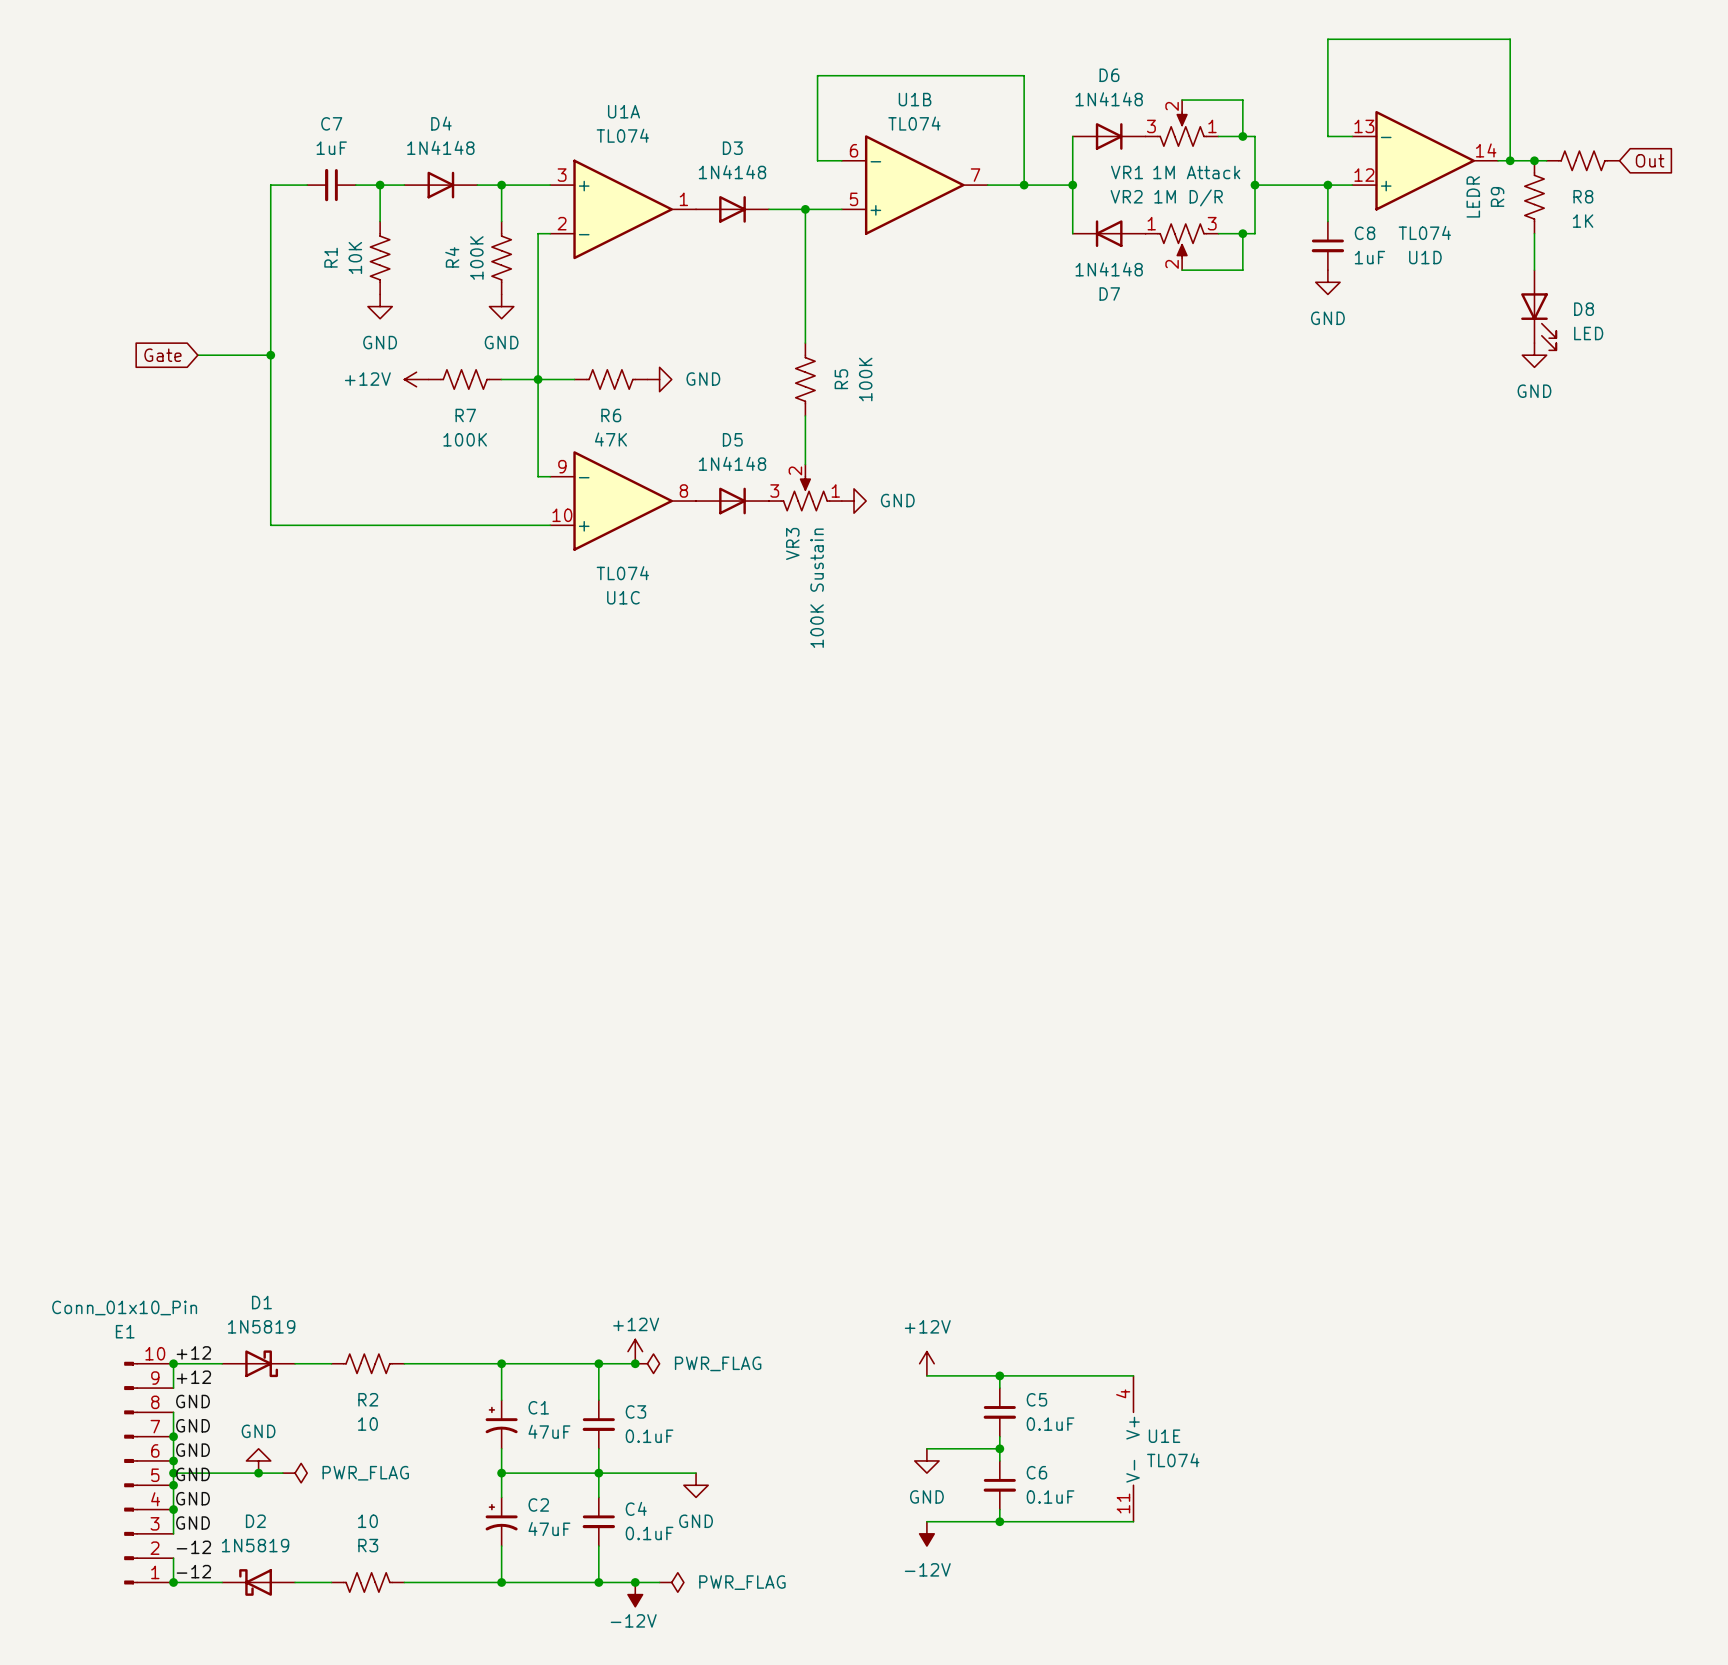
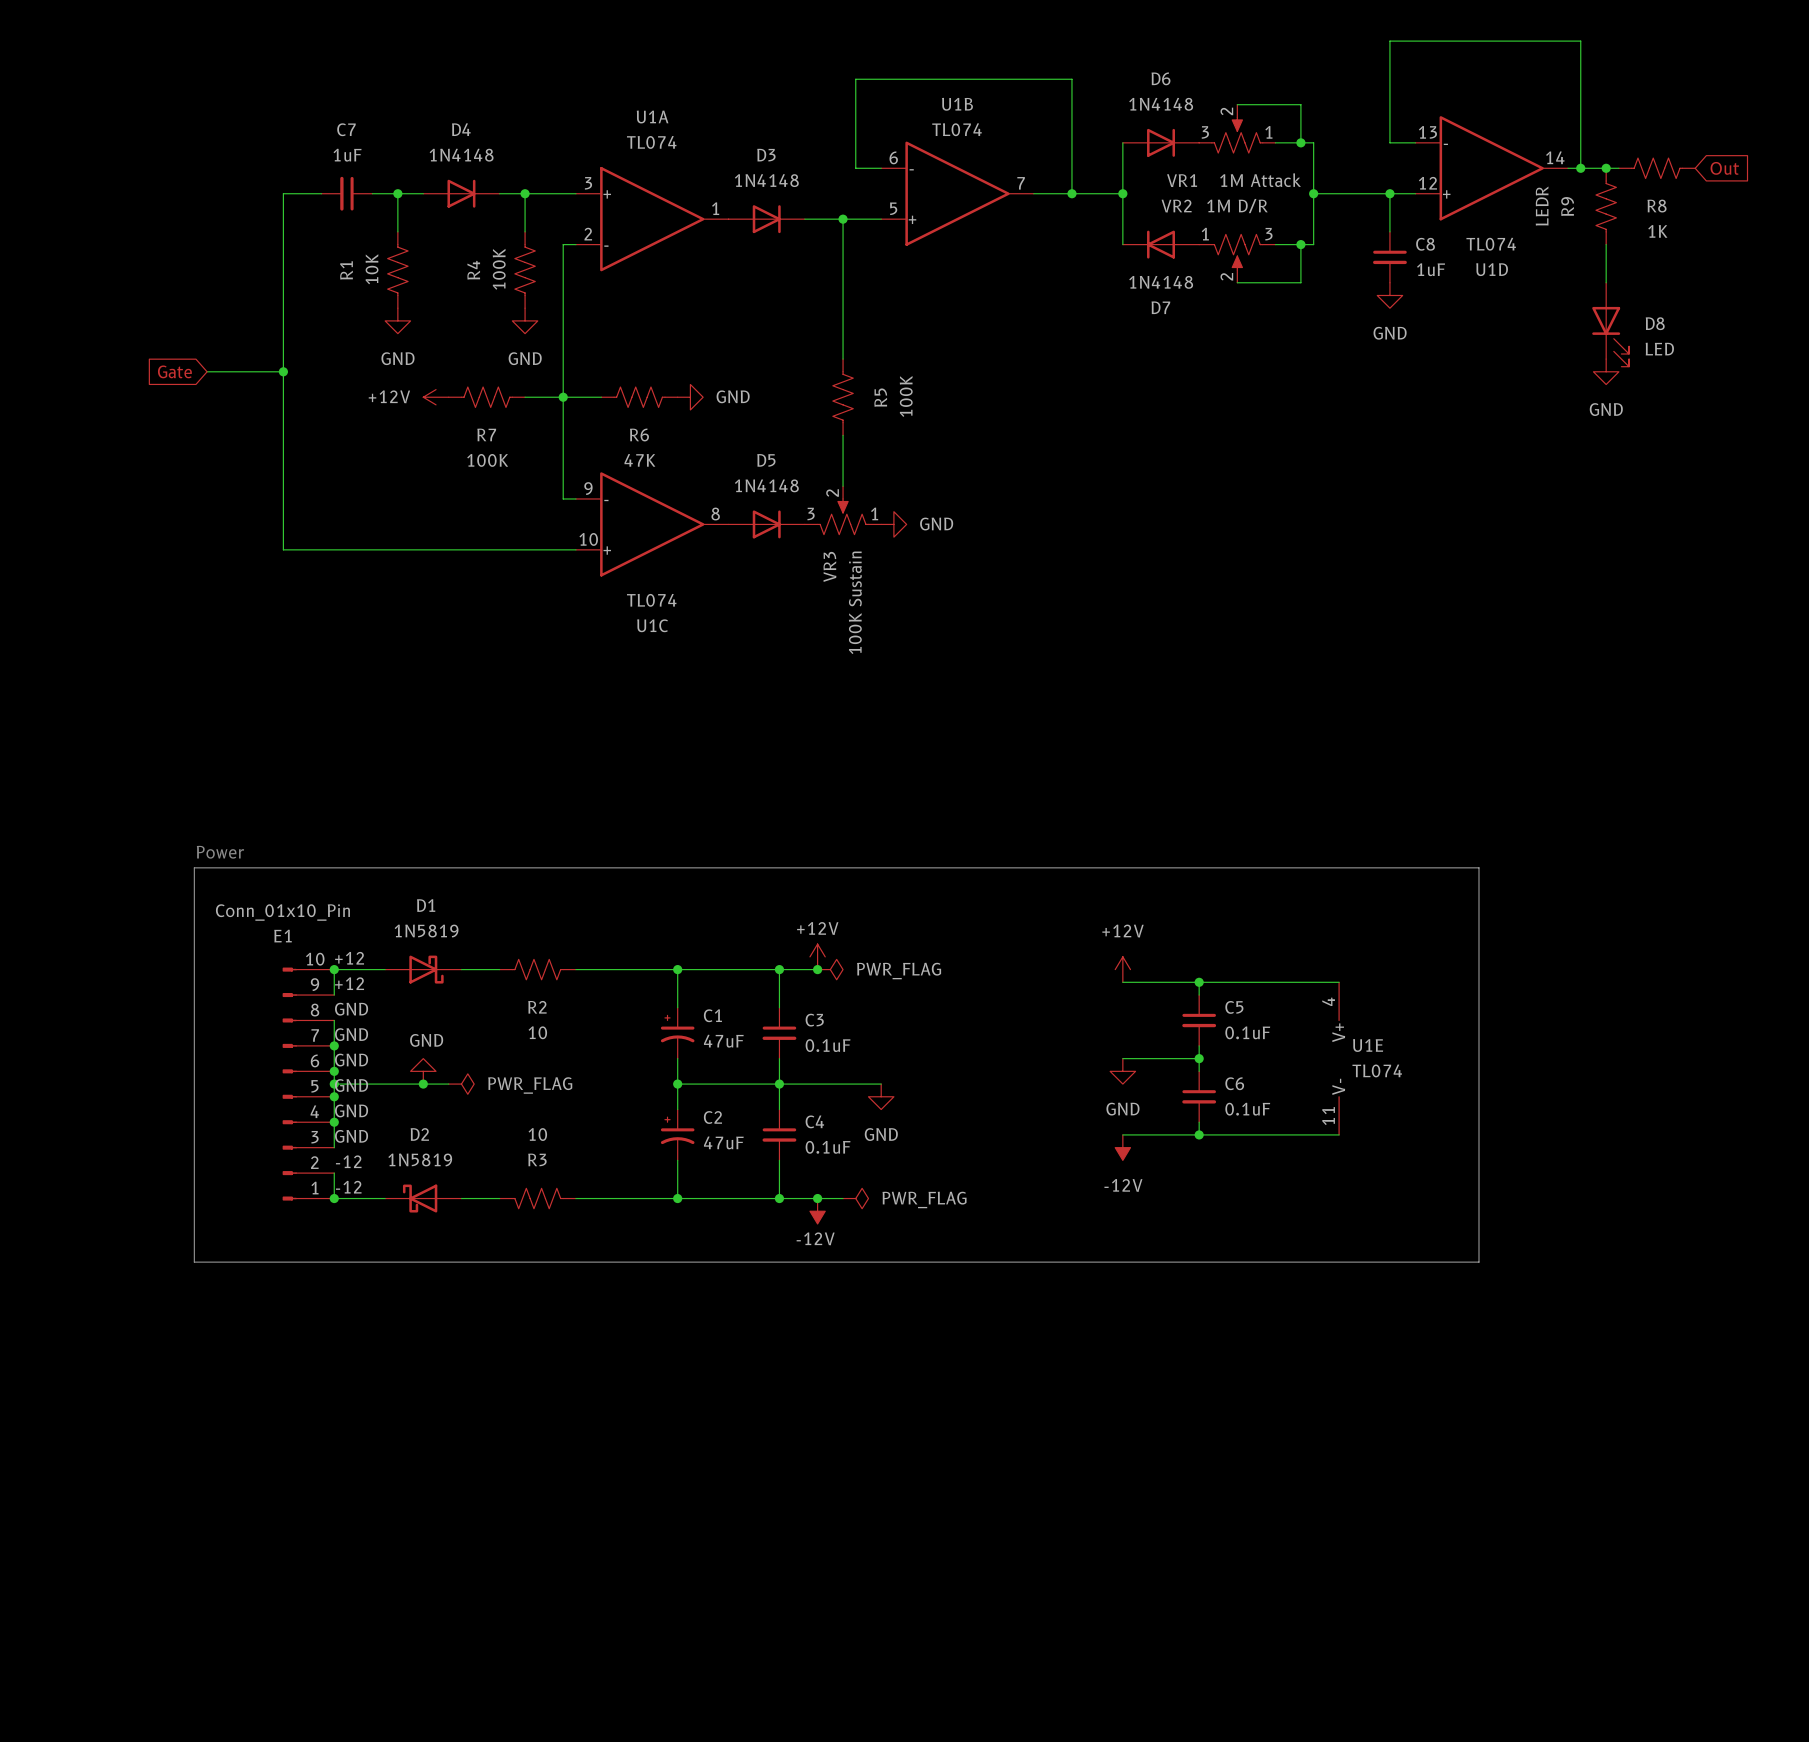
text: none -> Power (220, 852)
line: none -> (194, 867) (1478, 867) (1478, 1262) (194, 1262) (194, 867)
power symbol: none -> +12V (817, 956)
label: none -> +12 (349, 958)
junction: none -> (334, 969)
wire: none -> (385, 969) (334, 969) (334, 995)
wire: none -> (461, 969) (499, 969)
wire: none -> (575, 969) (817, 969)
wire: none -> (677, 969) (677, 1007)
junction: none -> (677, 969)
wire: none -> (779, 969) (779, 1007)
junction: none -> (779, 969)
junction: none -> (817, 969)
power symbol: none -> PWR_FLAG (830, 969)
power symbol: none -> +12V (1122, 969)
wire: none -> (1122, 982) (1339, 982)
wire: none -> (1199, 982) (1199, 995)
junction: none -> (1199, 982)
label: none -> +12 (349, 983)
label: none -> GND (351, 1009)
wire: none -> (334, 1020) (334, 1147)
label: none -> GND (351, 1034)
junction: none -> (334, 1045)
wire: none -> (1199, 1045) (1199, 1071)
wire: none -> (677, 1058) (677, 1109)
wire: none -> (779, 1058) (779, 1109)
wire: none -> (1122, 1058) (1199, 1058)
junction: none -> (1199, 1058)
label: none -> GND (351, 1060)
junction: none -> (334, 1071)
power symbol: none -> GND (423, 1071)
power symbol: none -> GND (1122, 1071)
wire: none -> (334, 1084) (448, 1084)
junction: none -> (334, 1084)
junction: none -> (423, 1084)
power symbol: none -> PWR_FLAG (461, 1084)
wire: none -> (677, 1084) (881, 1084)
junction: none -> (677, 1084)
junction: none -> (779, 1084)
label: none -> GND (351, 1085)
junction: none -> (334, 1096)
power symbol: none -> GND (881, 1096)
label: none -> GND (351, 1110)
junction: none -> (334, 1122)
wire: none -> (1199, 1122) (1199, 1134)
wire: none -> (1122, 1134) (1339, 1134)
junction: none -> (1199, 1134)
label: none -> GND (351, 1136)
power symbol: none -> -12V (1122, 1147)
wire: none -> (677, 1160) (677, 1198)
wire: none -> (779, 1160) (779, 1198)
label: none -> -12 (348, 1161)
wire: none -> (334, 1173) (334, 1198) (385, 1198)
label: none -> -12 (348, 1187)
junction: none -> (334, 1198)
wire: none -> (461, 1198) (499, 1198)
wire: none -> (575, 1198) (843, 1198)
junction: none -> (677, 1198)
junction: none -> (779, 1198)
junction: none -> (817, 1198)
power symbol: none -> PWR_FLAG (855, 1198)
power symbol: none -> -12V (817, 1211)
power symbol: +12V (635, 1351) -> none
label: +12 (193, 1352) -> none
junction: (173, 1363) -> none
wire: (222, 1363) (173, 1363) (173, 1388) -> none
D1 position: (258, 1363) -> (423, 969)
wire: (295, 1363) (331, 1363) -> none
R2 position: (367, 1363) -> (537, 969)
wire: (404, 1363) (635, 1363) -> none
wire: (501, 1363) (501, 1400) -> none
junction: (501, 1363) -> none
wire: (598, 1363) (598, 1400) -> none
junction: (598, 1363) -> none
junction: (635, 1363) -> none
power symbol: PWR_FLAG (647, 1363) -> none
power symbol: +12V (926, 1363) -> none
wire: (926, 1375) (1133, 1375) -> none
wire: (999, 1375) (999, 1388) -> none
junction: (999, 1375) -> none
label: +12 (193, 1377) -> none
label: GND (193, 1401) -> none
wire: (173, 1412) (173, 1533) -> none
C5 position: (999, 1412) -> (1199, 1020)
C1 position: (501, 1424) -> (677, 1033)
C3 position: (598, 1424) -> (779, 1033)
label: GND (193, 1425) -> none
junction: (173, 1436) -> none
wire: (999, 1436) (999, 1460) -> none
wire: (501, 1448) (501, 1497) -> none
wire: (598, 1448) (598, 1497) -> none
wire: (926, 1448) (999, 1448) -> none
junction: (999, 1448) -> none
U1E position: (1133, 1448) -> (1339, 1058)
label: GND (193, 1450) -> none
junction: (173, 1460) -> none
power symbol: GND (258, 1460) -> none
power symbol: GND (926, 1460) -> none
E1 position: (148, 1473) -> (308, 1084)
wire: (173, 1473) (282, 1473) -> none
junction: (173, 1473) -> none
junction: (258, 1473) -> none
power symbol: PWR_FLAG (295, 1473) -> none
wire: (501, 1473) (696, 1473) -> none
junction: (501, 1473) -> none
junction: (598, 1473) -> none
label: GND (193, 1474) -> none
junction: (173, 1485) -> none
power symbol: GND (696, 1485) -> none
C6 position: (999, 1485) -> (1199, 1096)
label: GND (193, 1498) -> none
junction: (173, 1509) -> none
wire: (999, 1509) (999, 1521) -> none
C2 position: (501, 1521) -> (677, 1134)
C4 position: (598, 1521) -> (779, 1134)
wire: (926, 1521) (1133, 1521) -> none
junction: (999, 1521) -> none
label: GND (193, 1523) -> none
power symbol: -12V (926, 1533) -> none
wire: (501, 1546) (501, 1582) -> none
wire: (598, 1546) (598, 1582) -> none
label: -12 (193, 1547) -> none
wire: (173, 1558) (173, 1582) (222, 1582) -> none
label: -12 (193, 1571) -> none
junction: (173, 1582) -> none
D2 position: (258, 1582) -> (423, 1198)
wire: (295, 1582) (331, 1582) -> none
R3 position: (367, 1582) -> (537, 1198)
wire: (404, 1582) (659, 1582) -> none
junction: (501, 1582) -> none
junction: (598, 1582) -> none
junction: (635, 1582) -> none
power symbol: PWR_FLAG (671, 1582) -> none
power symbol: -12V (635, 1594) -> none

